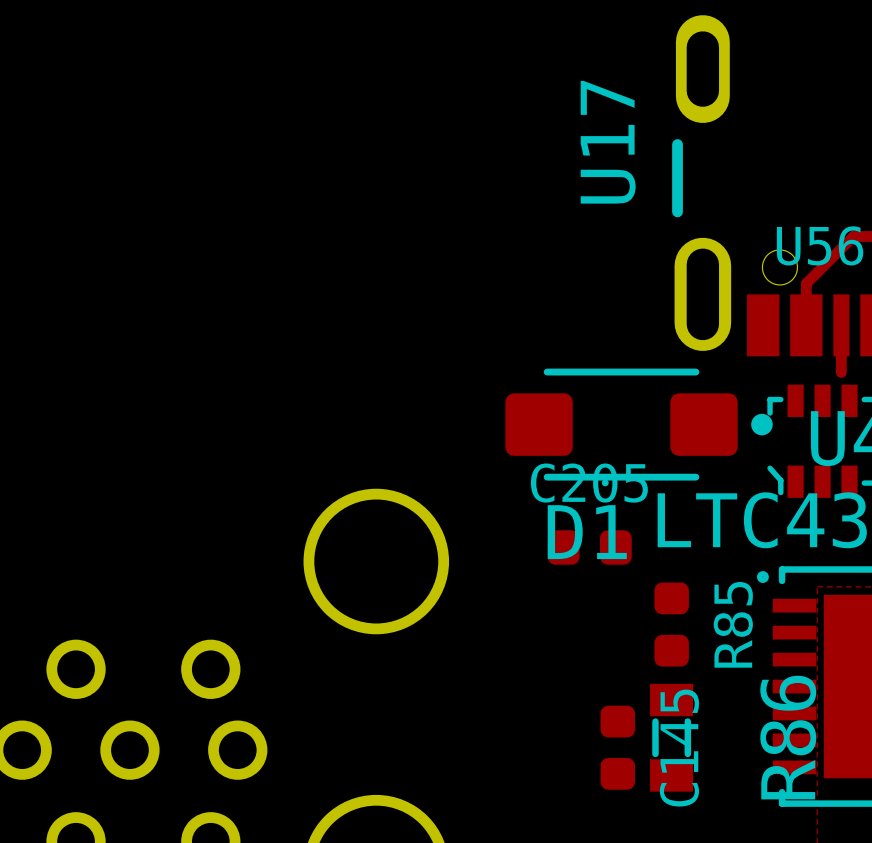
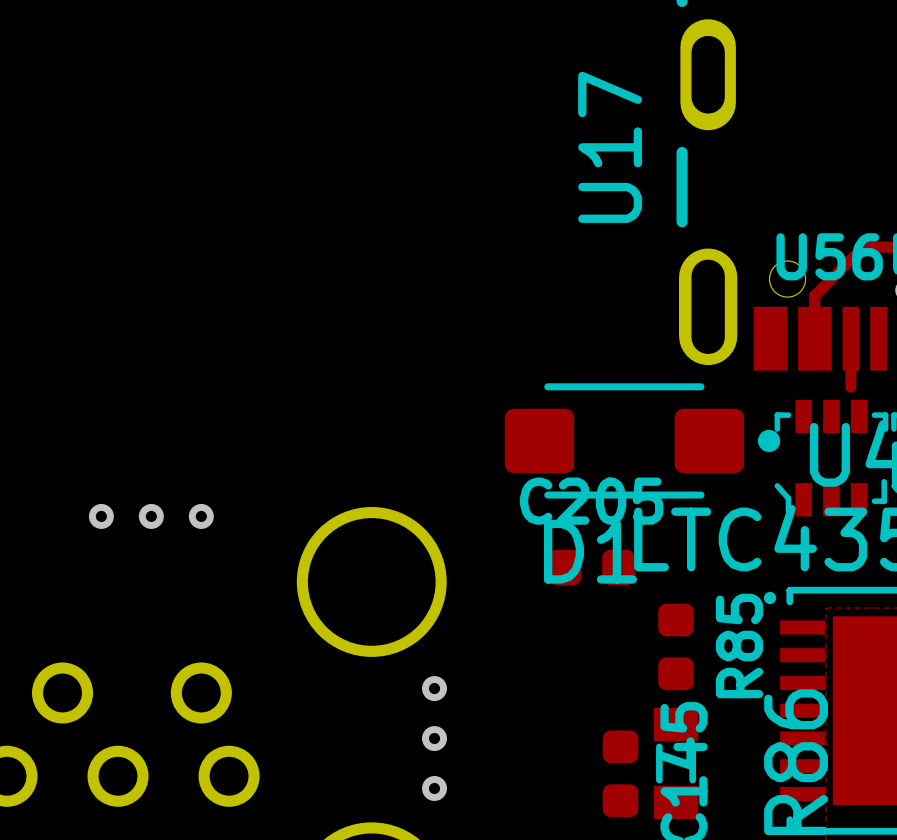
via: none -> (101, 516)
via: none -> (151, 516)
via: none -> (201, 516)
via: none -> (434, 688)
via: none -> (434, 738)
via: none -> (434, 788)

